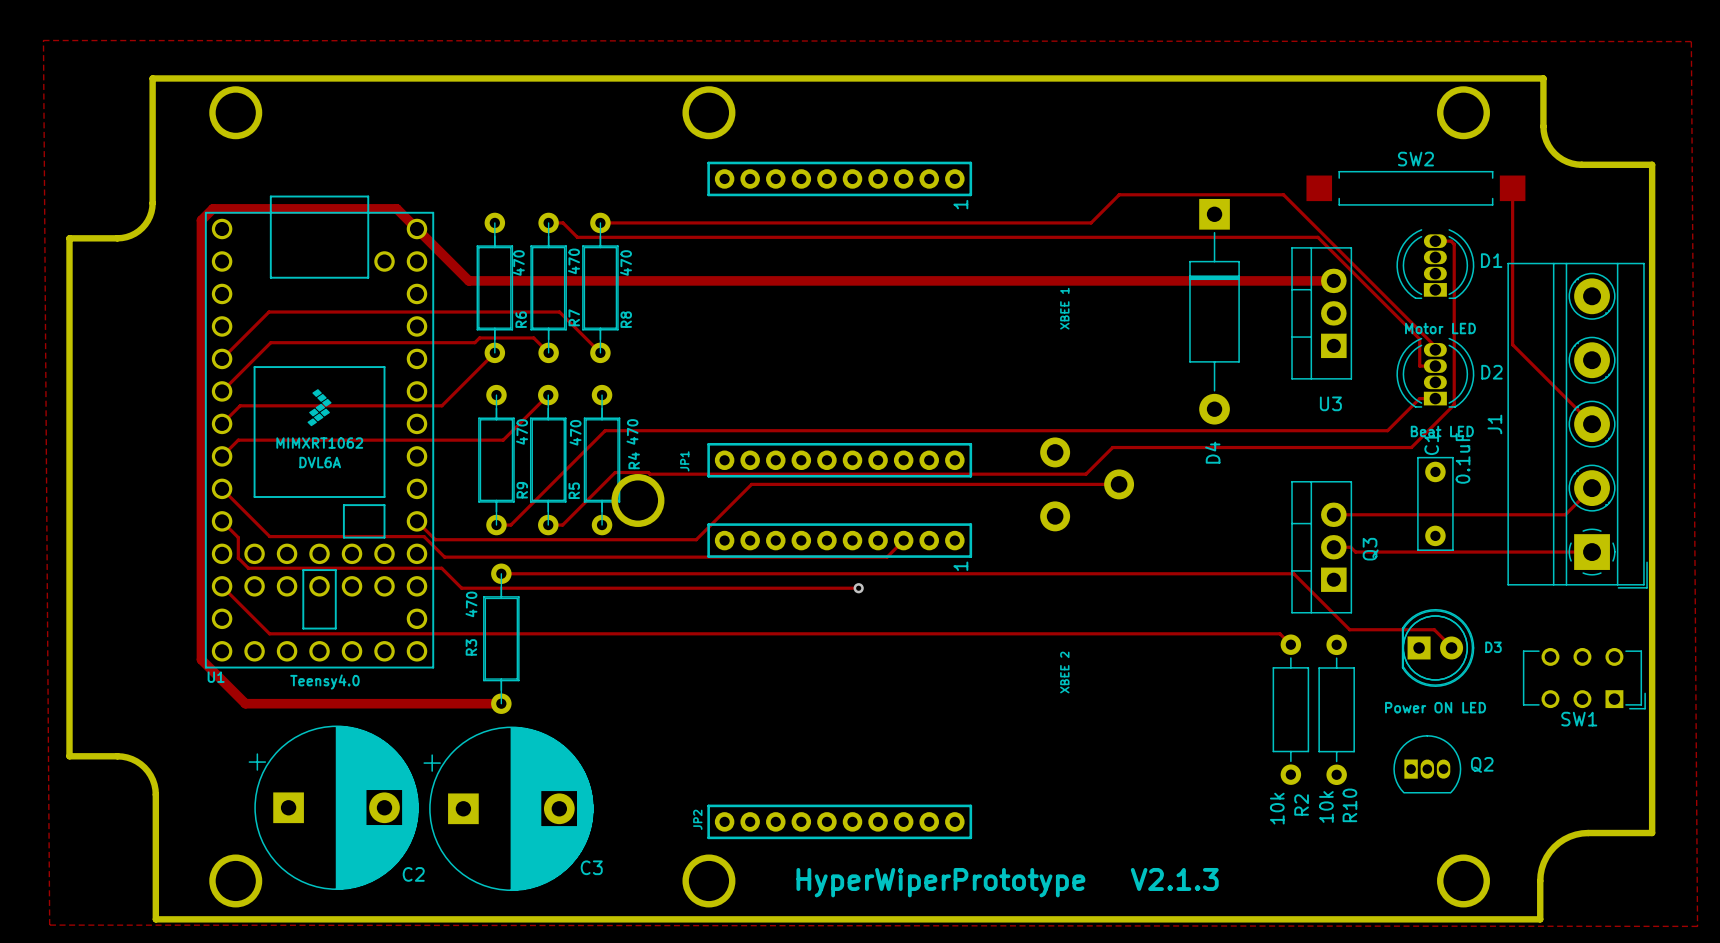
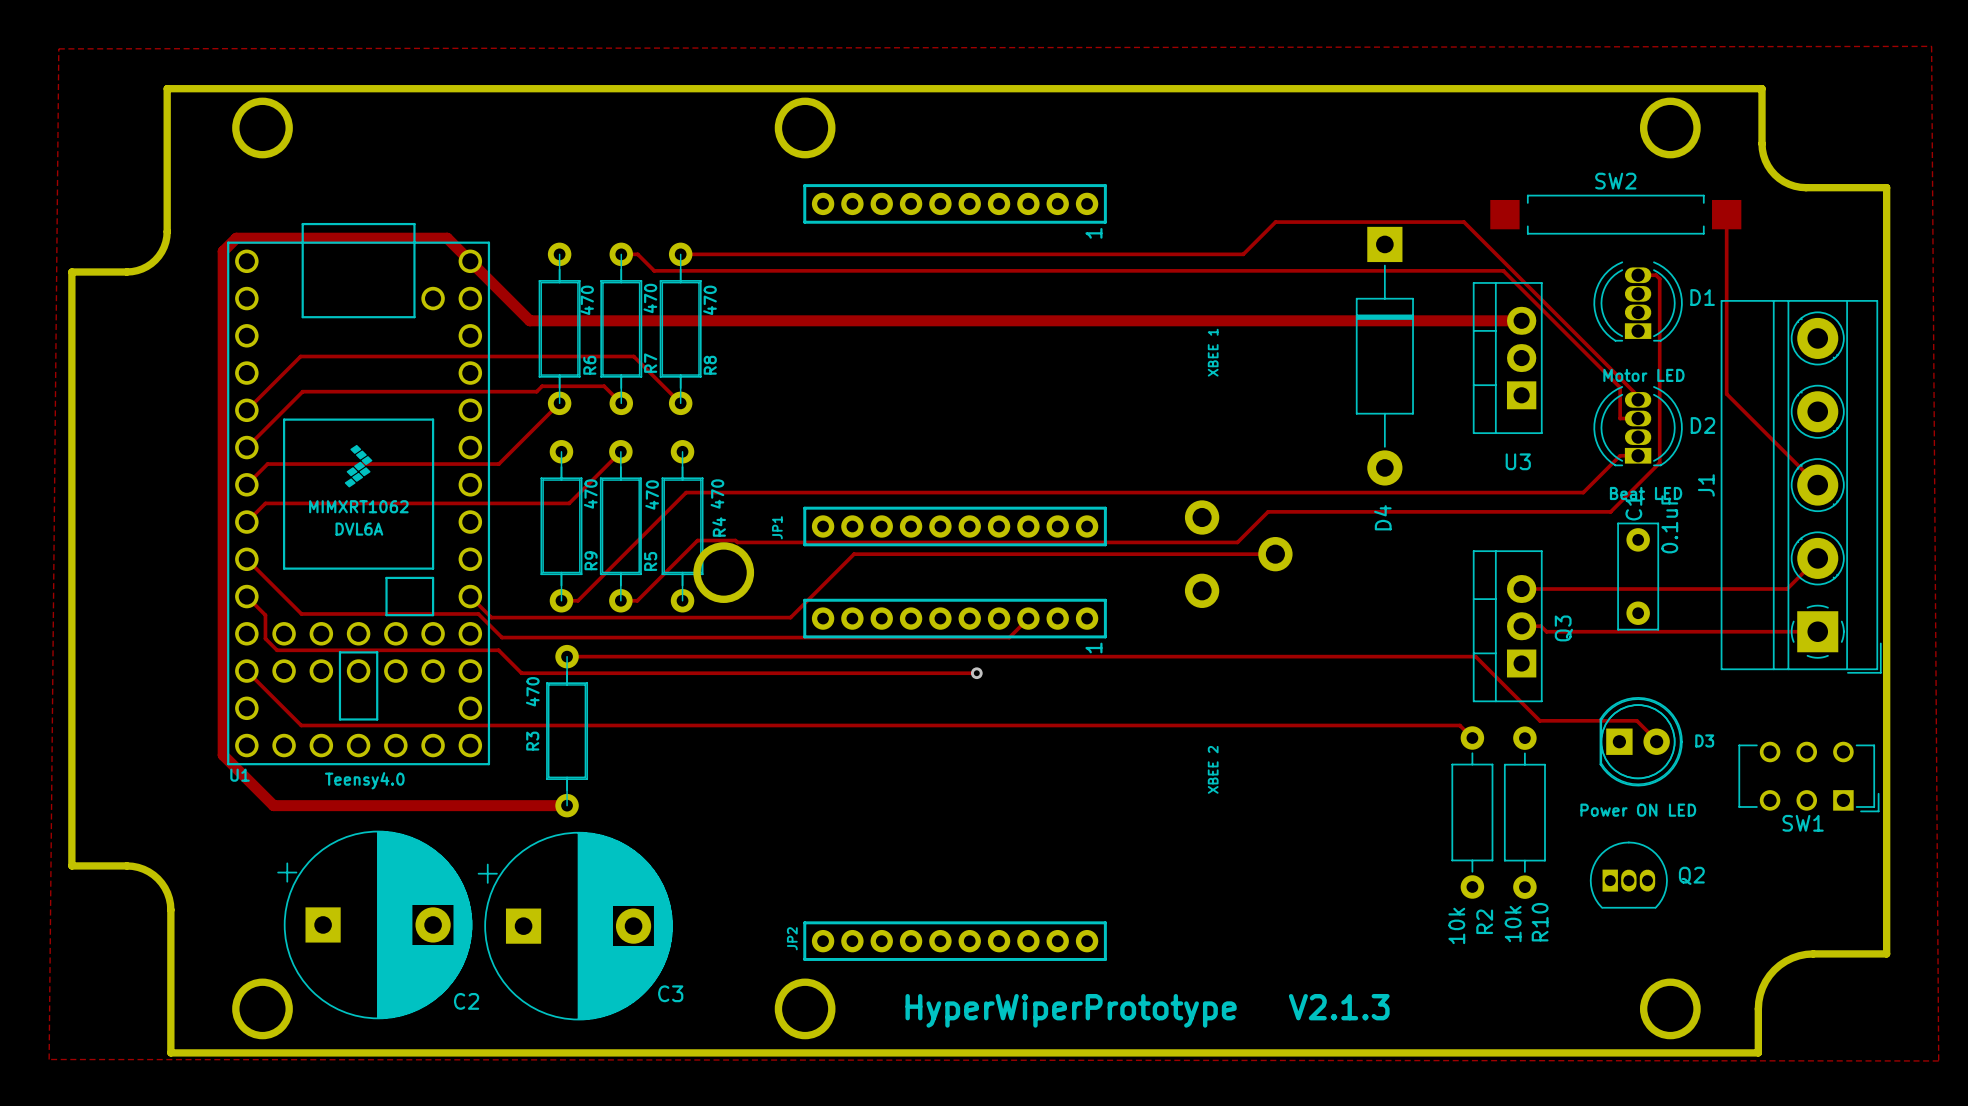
zone outline: (1691, 41) (43, 40) (49, 925) -> (1931, 46) (58, 48) (49, 1059)

